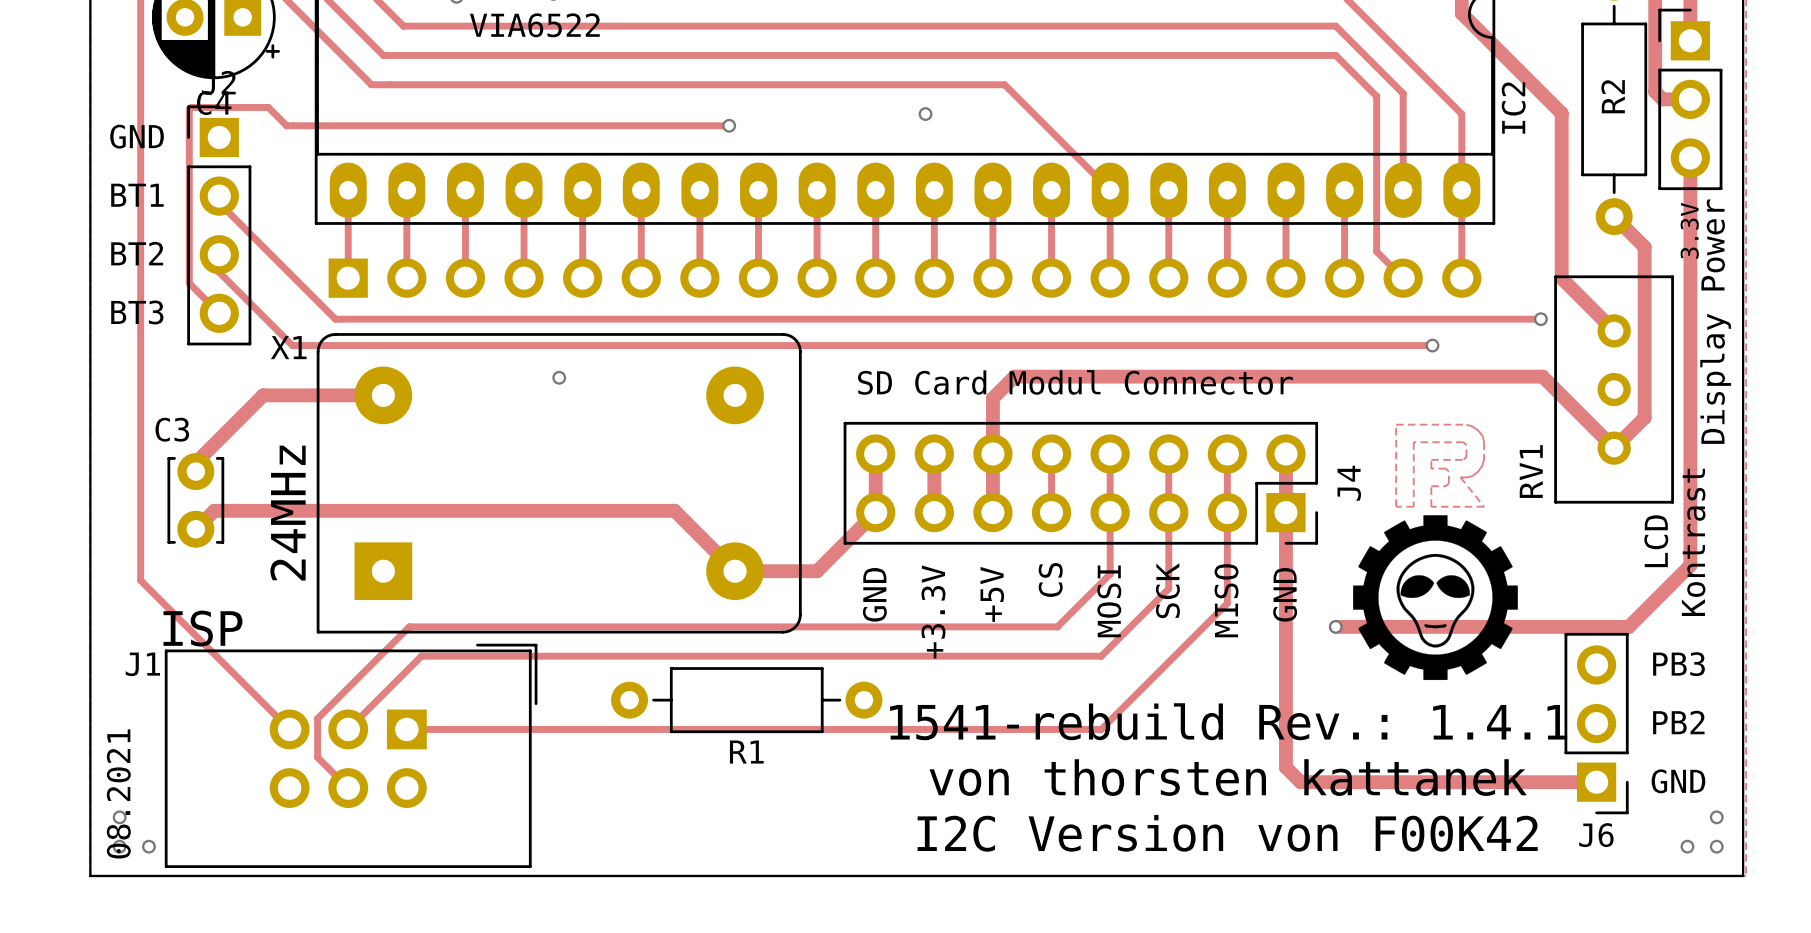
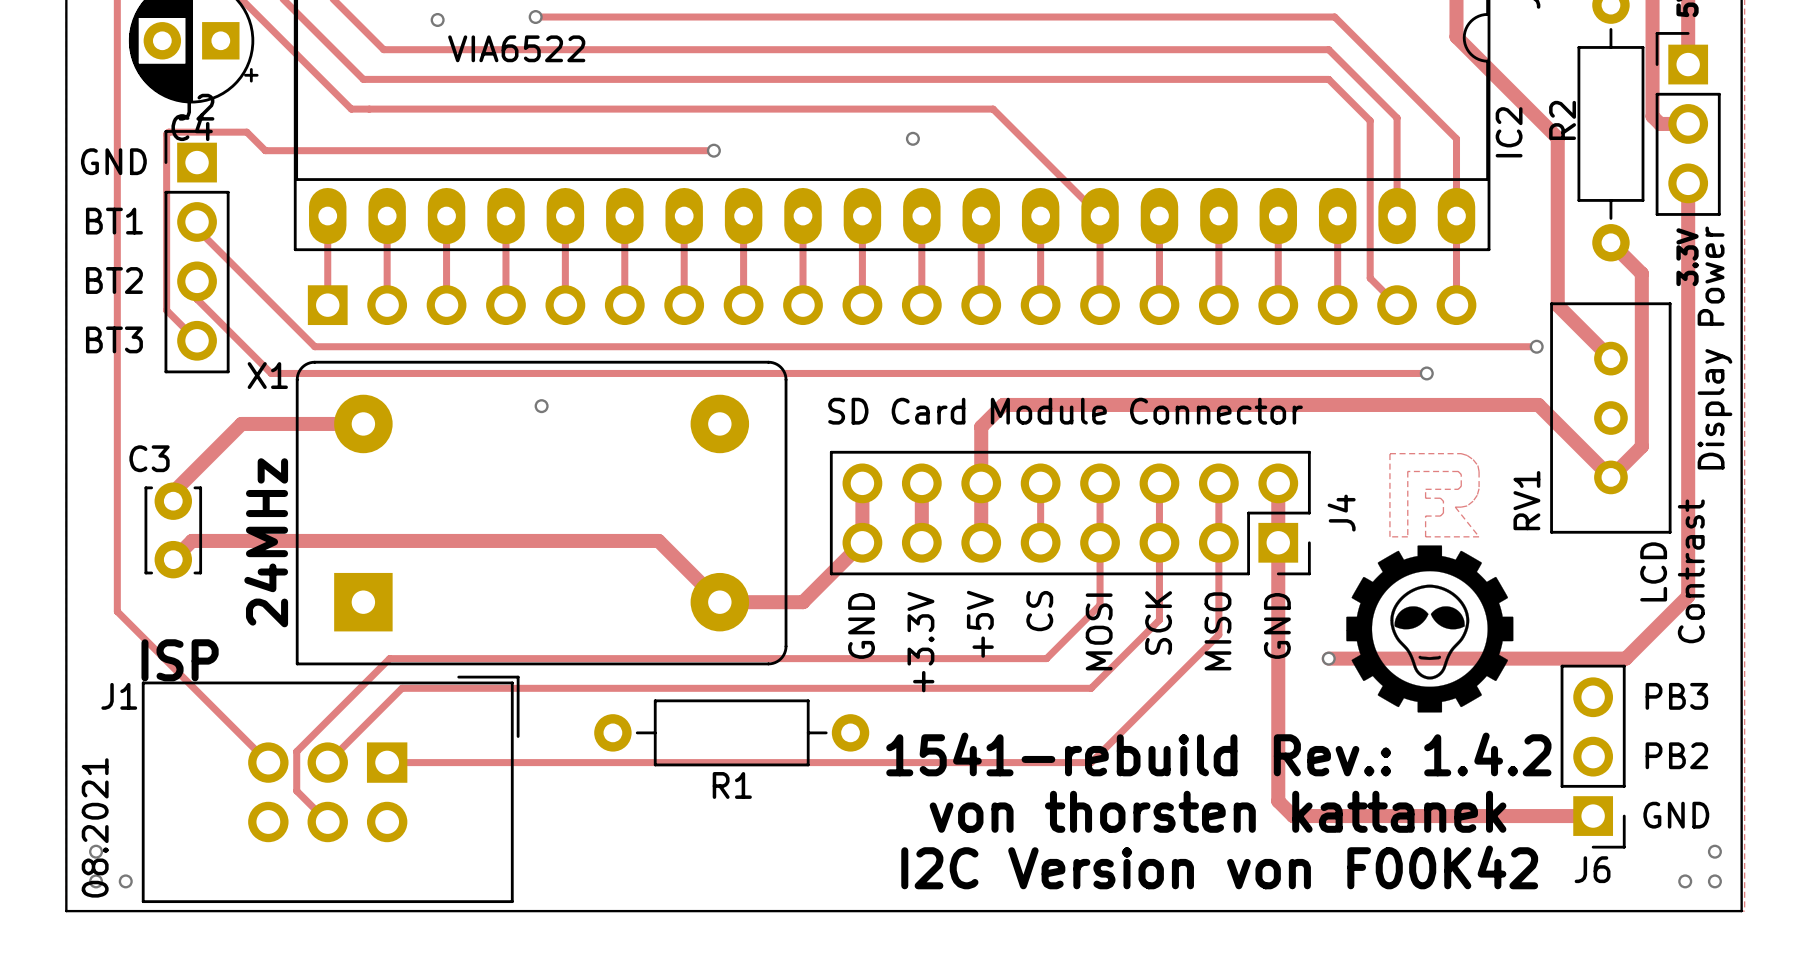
R2 name position: R2 (1613, 96) -> R2 (1562, 120)
J4 value: SD Card Modul Connector (1075, 382) -> SD Card Module Connector (1065, 411)
text: Kontrast (1693, 542) -> Contrast (1691, 571)
text: 1541-rebuild Rev.: 1.4.1 (1228, 721) -> 1541-rebuild Rev.: 1.4.2 (1218, 754)

